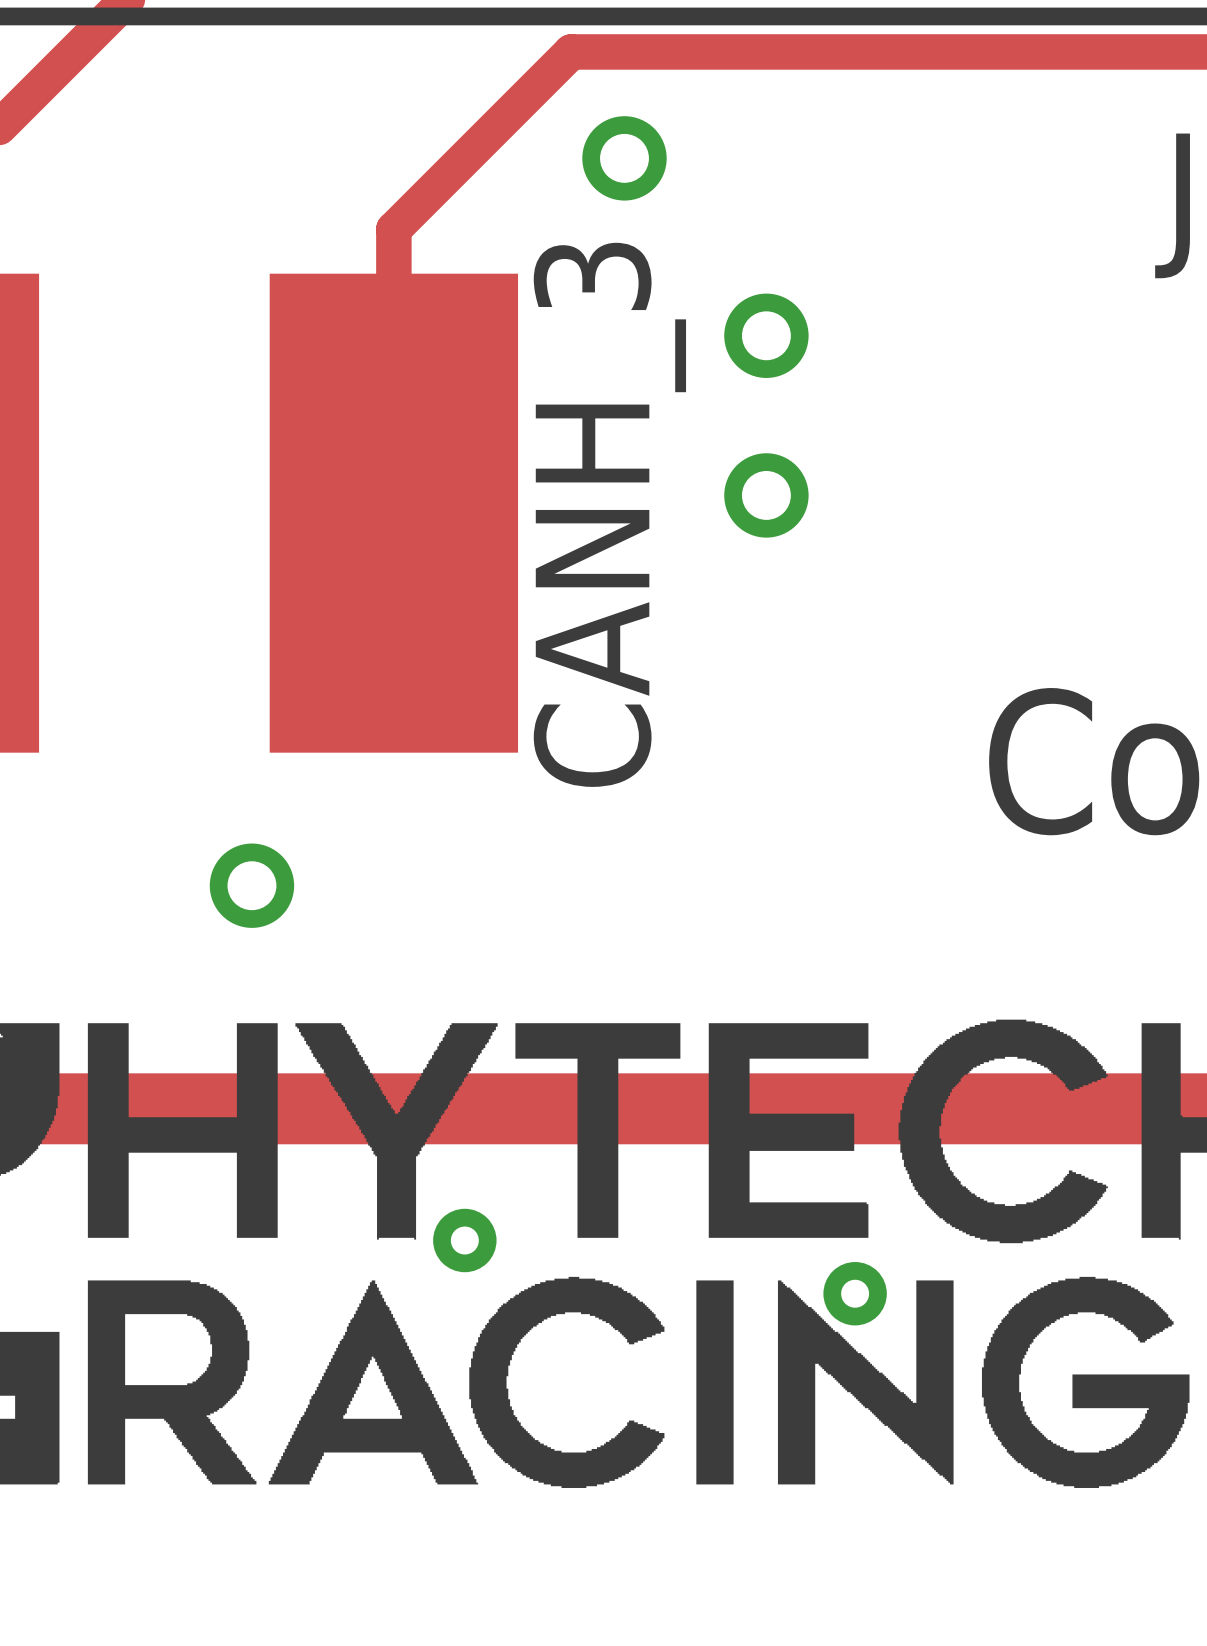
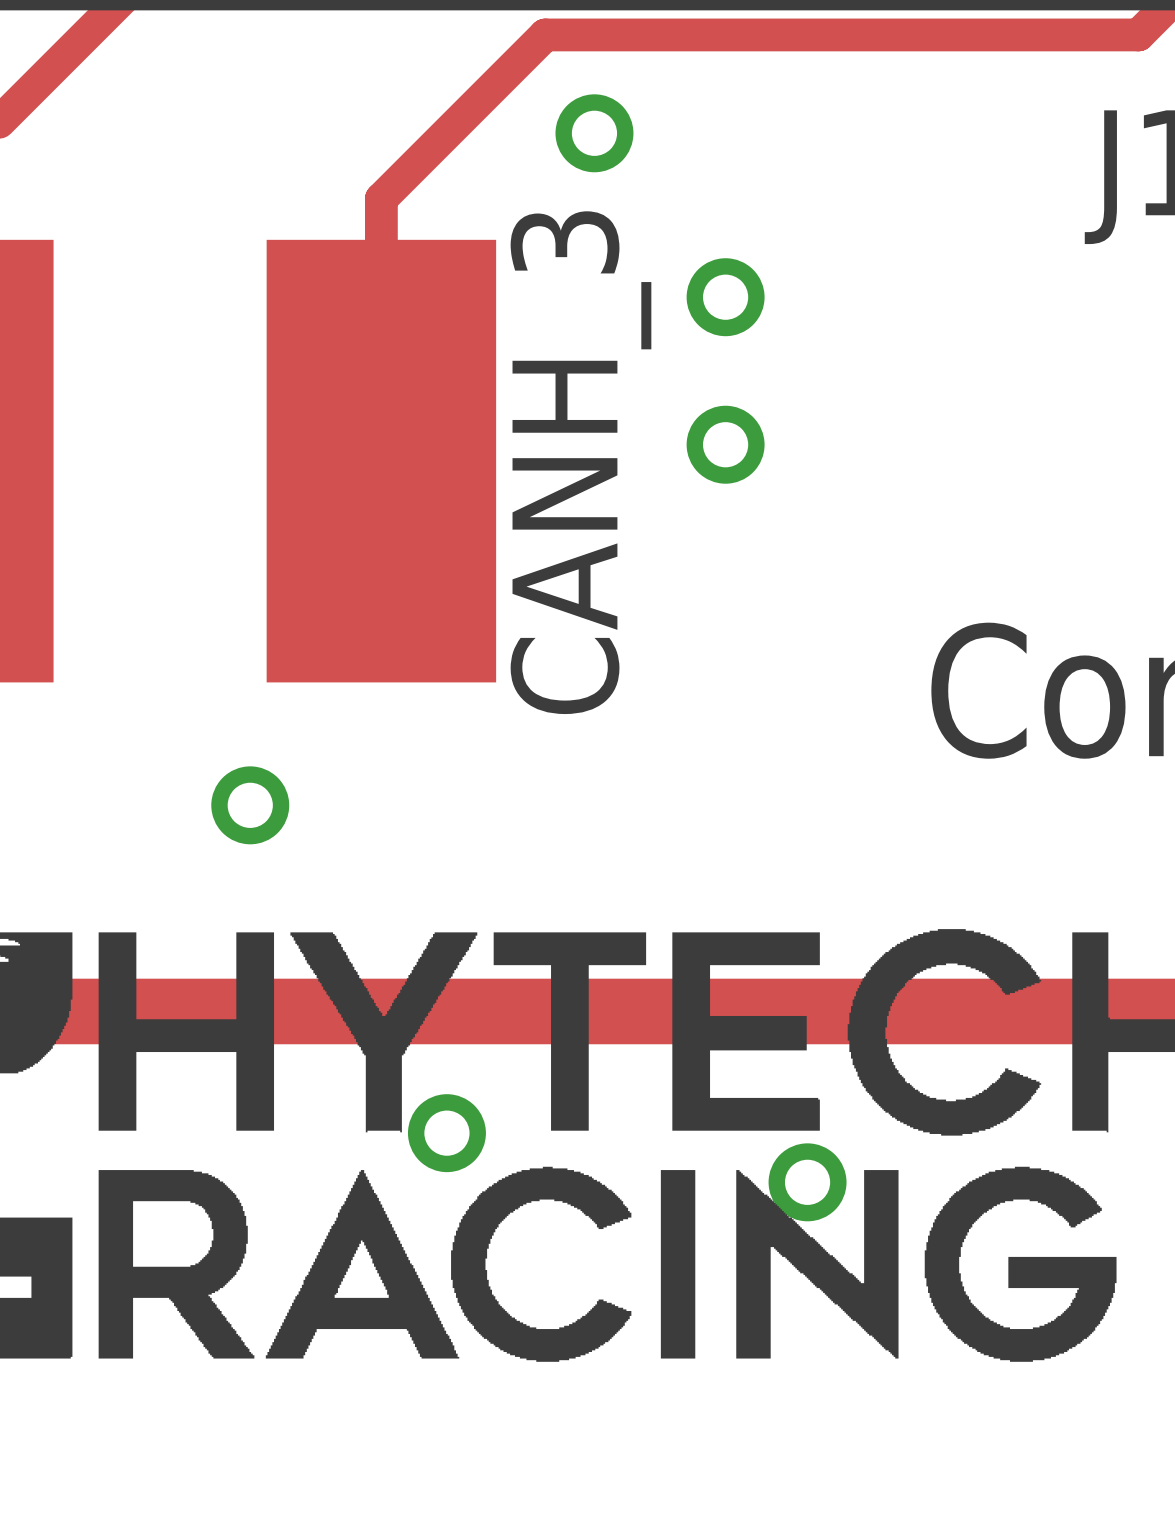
via size: [433, 1208, 497, 1273] -> [407, 1094, 486, 1173]
via size: [823, 1262, 887, 1326] -> [768, 1143, 847, 1222]

